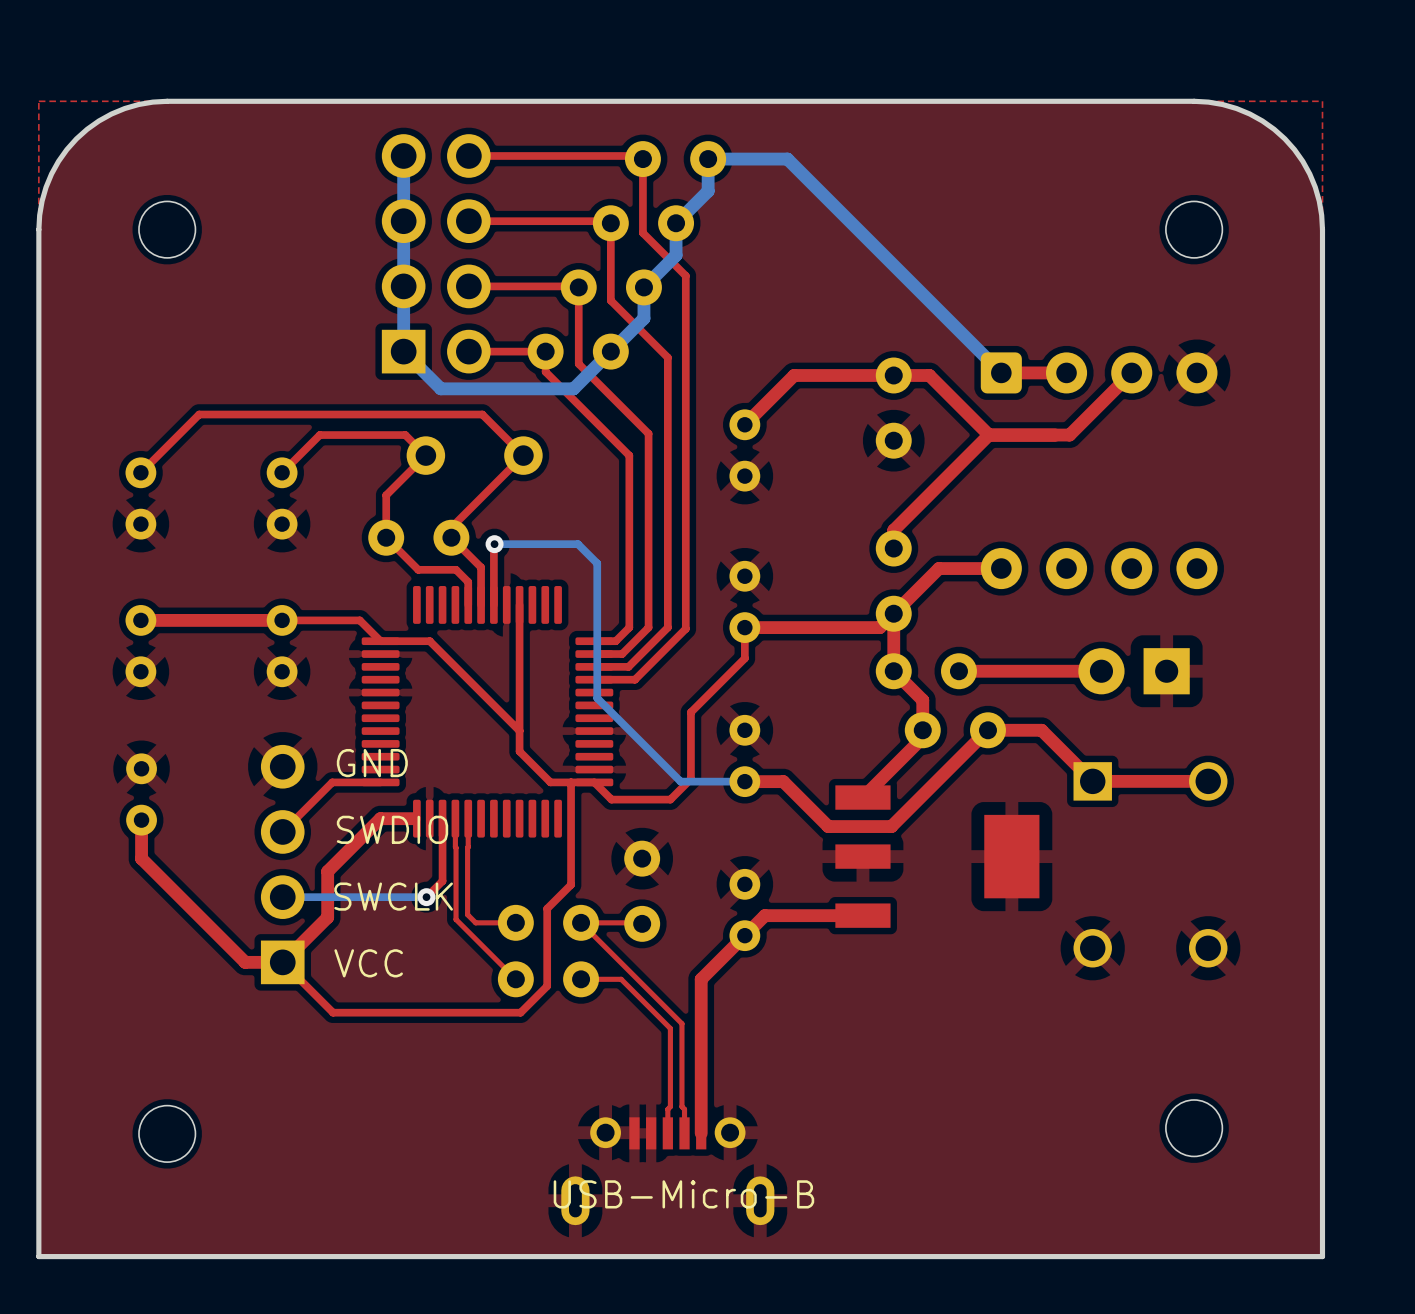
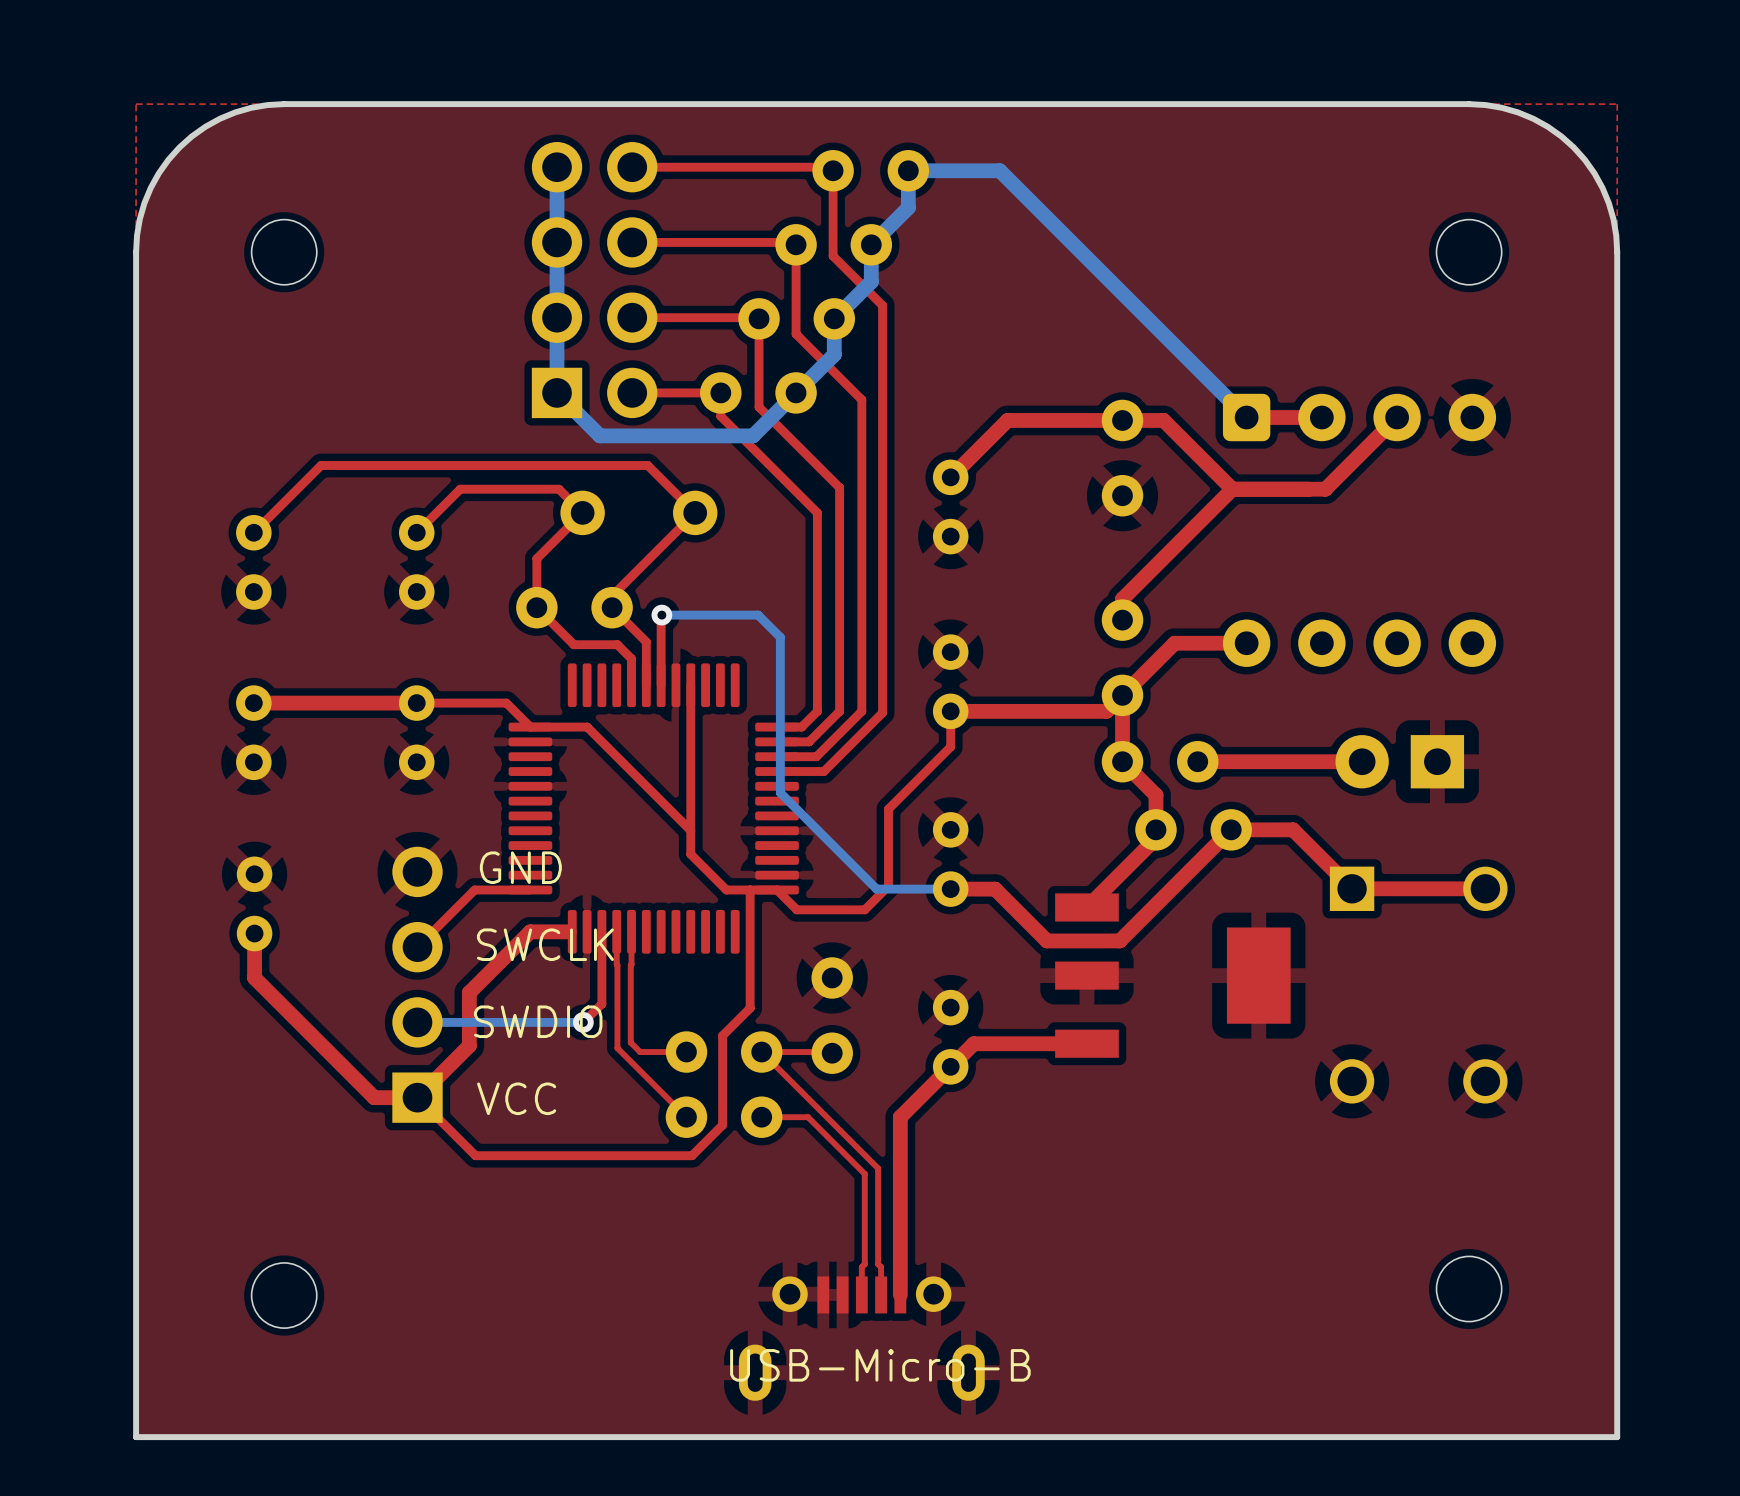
text: SWDIO (392, 829) -> SWCLK (545, 944)
text: SWCLK (393, 896) -> SWDIO (538, 1021)

